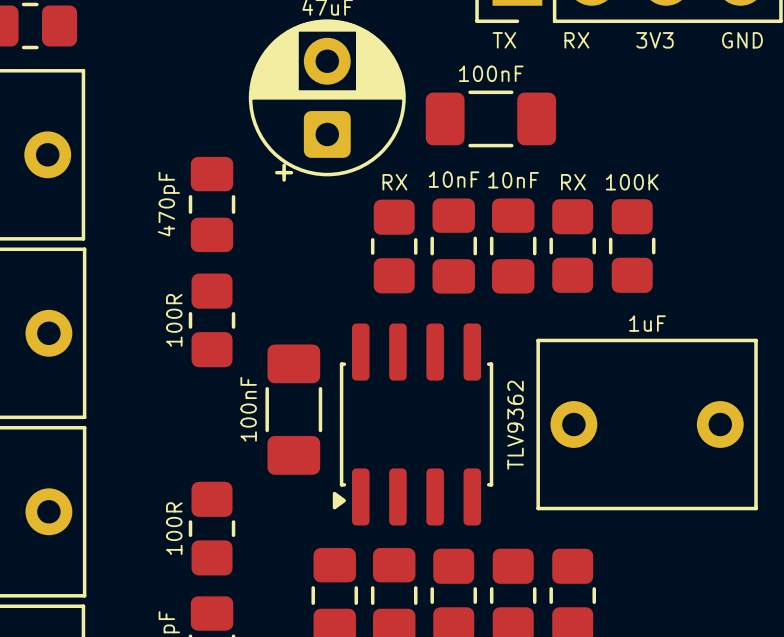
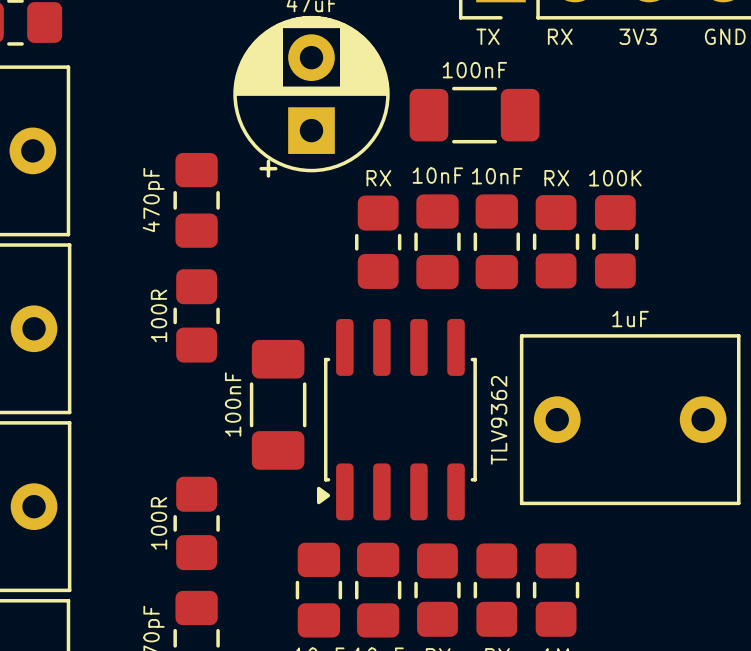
part footprint: [248, 19, 406, 182] -> [233, 15, 390, 178]

